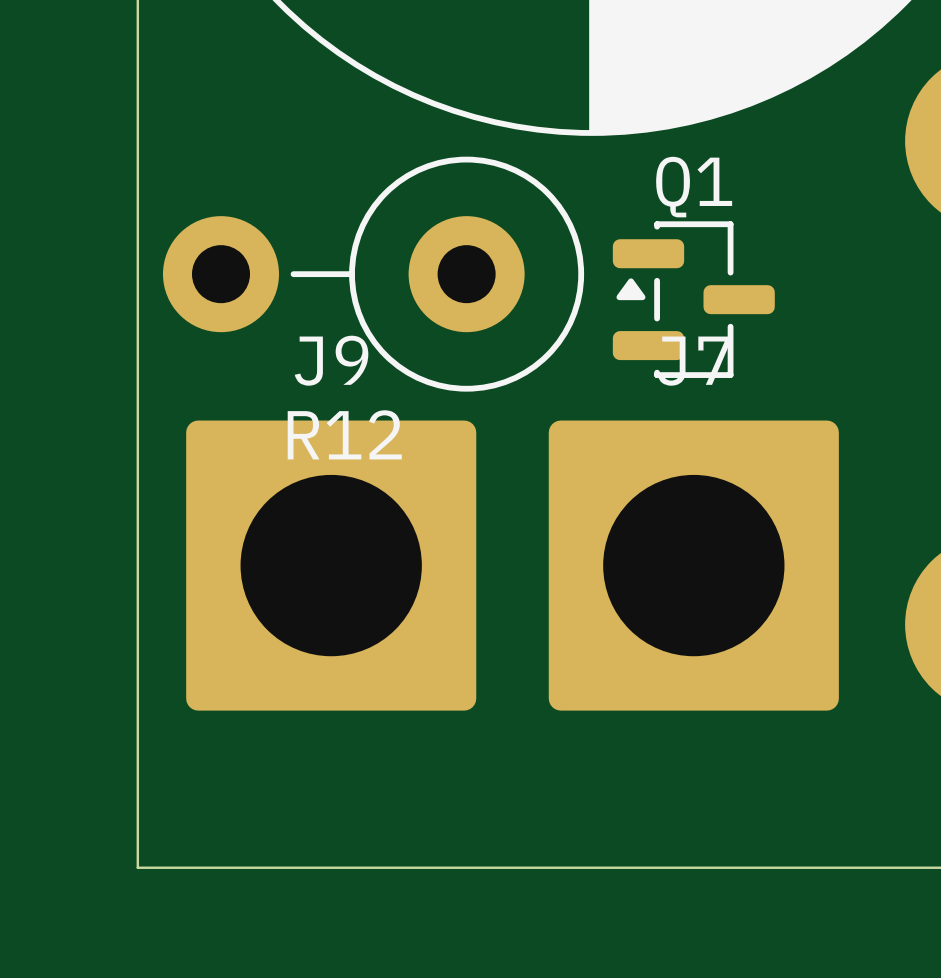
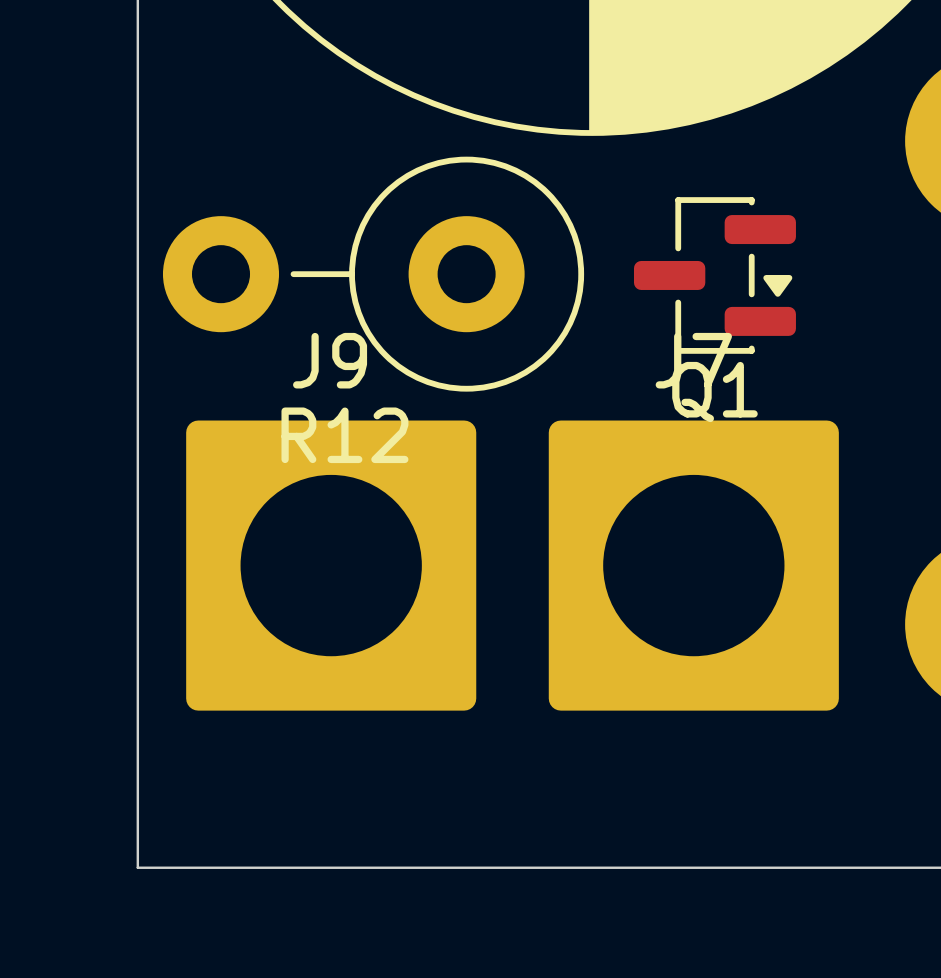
Q1 rotation: 0° (693, 299) -> 180° (714, 275)

